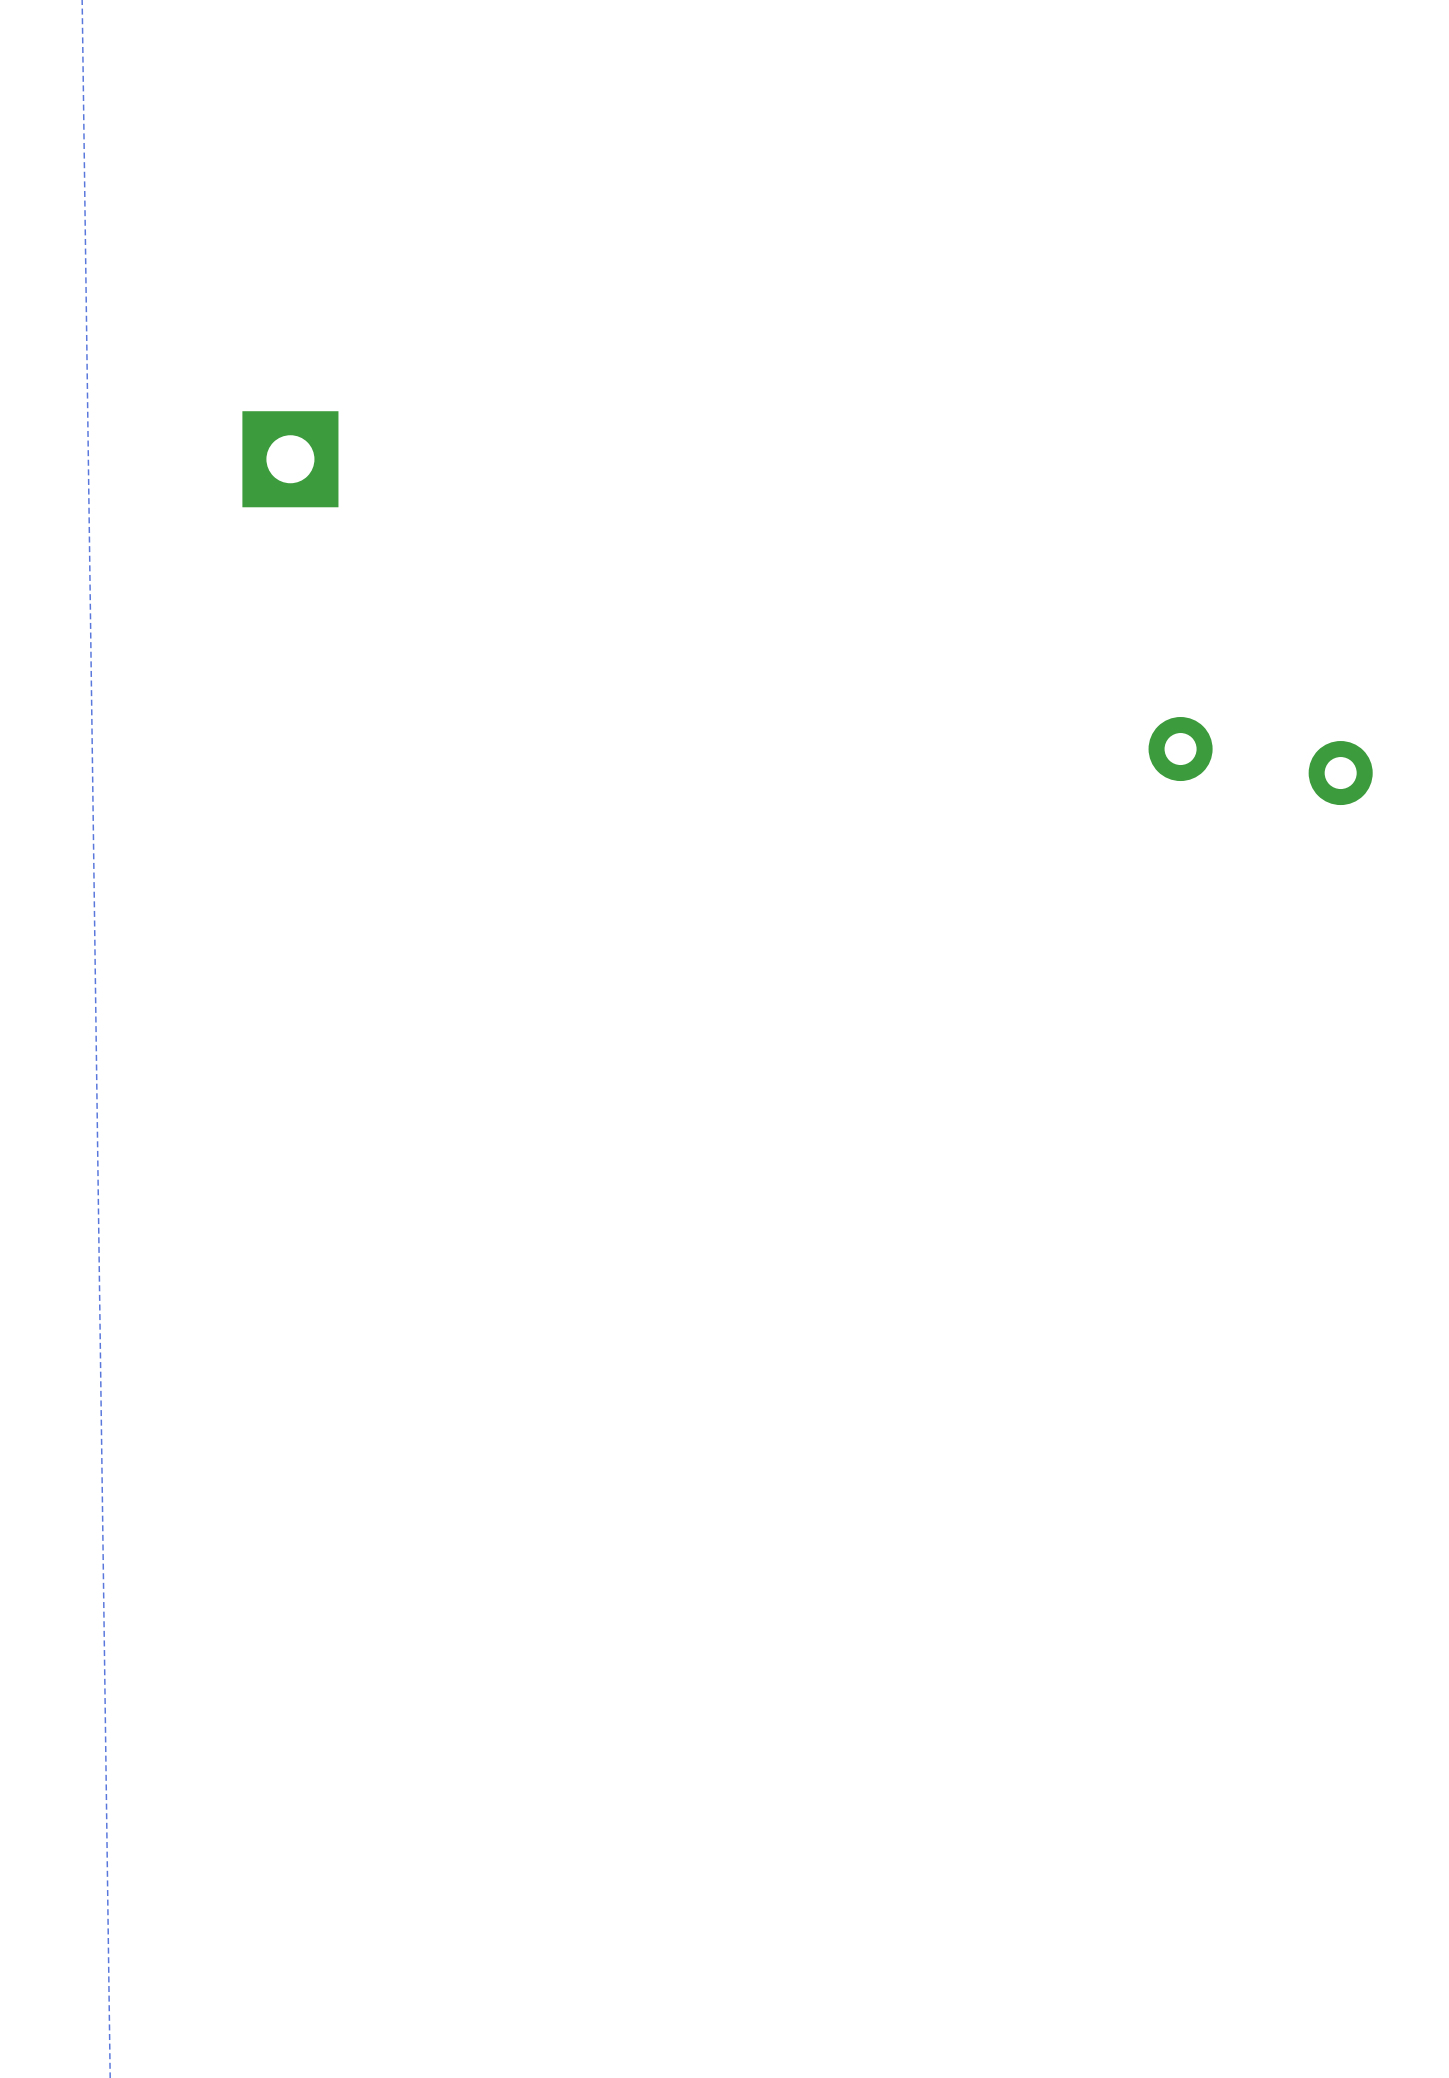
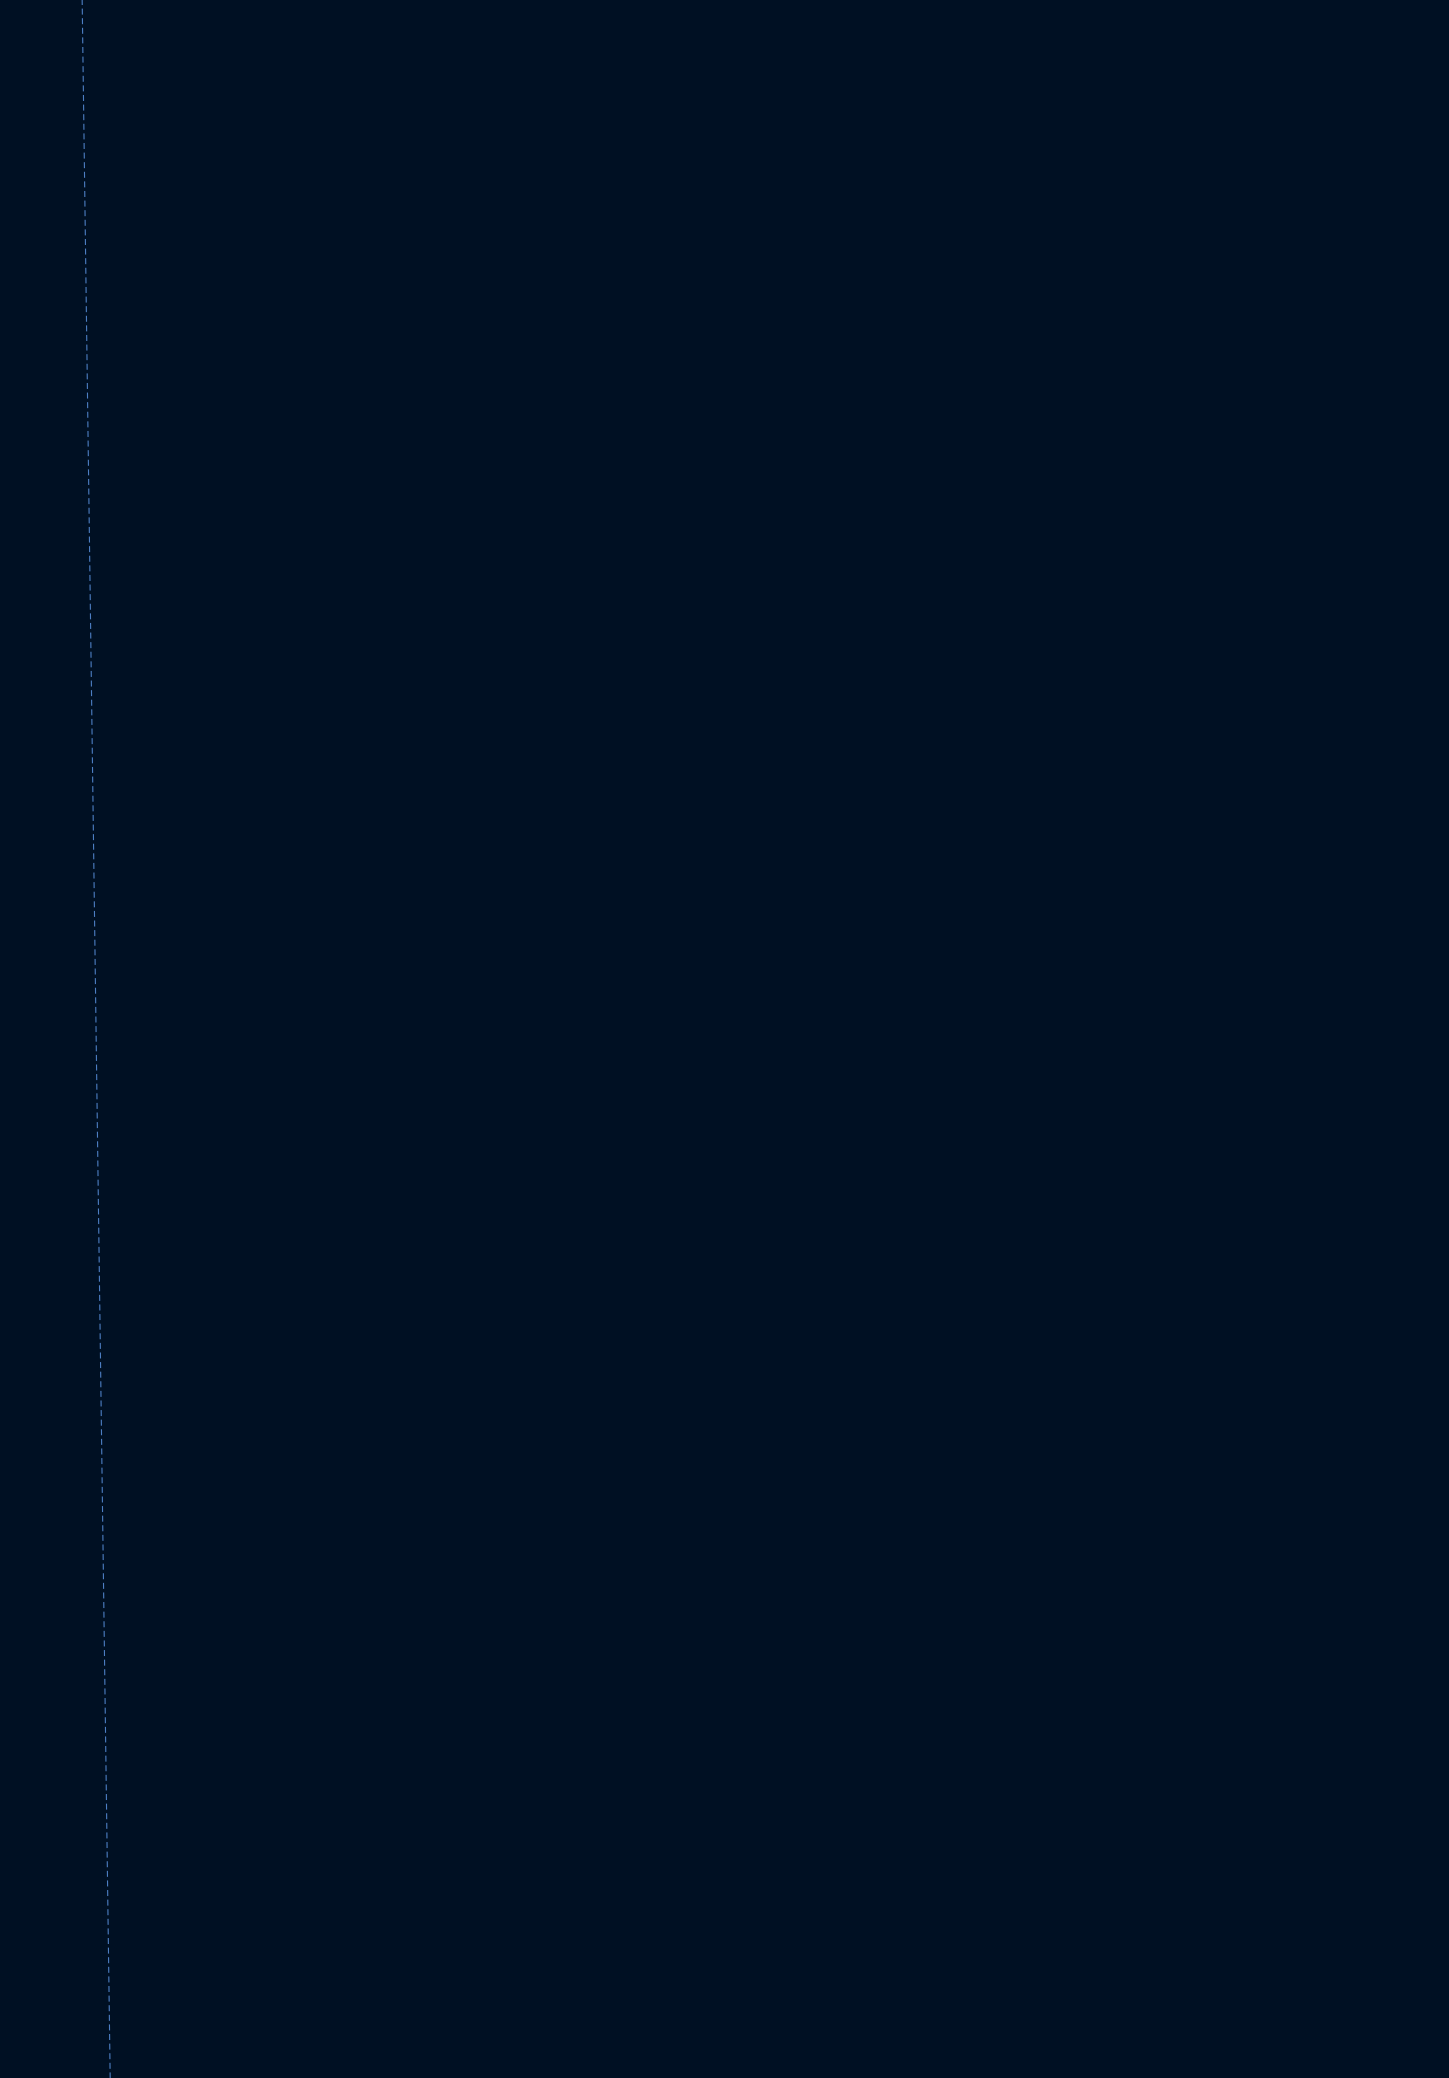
part: (290, 459) -> none
part: (1180, 749) -> none
part: (1340, 773) -> none

